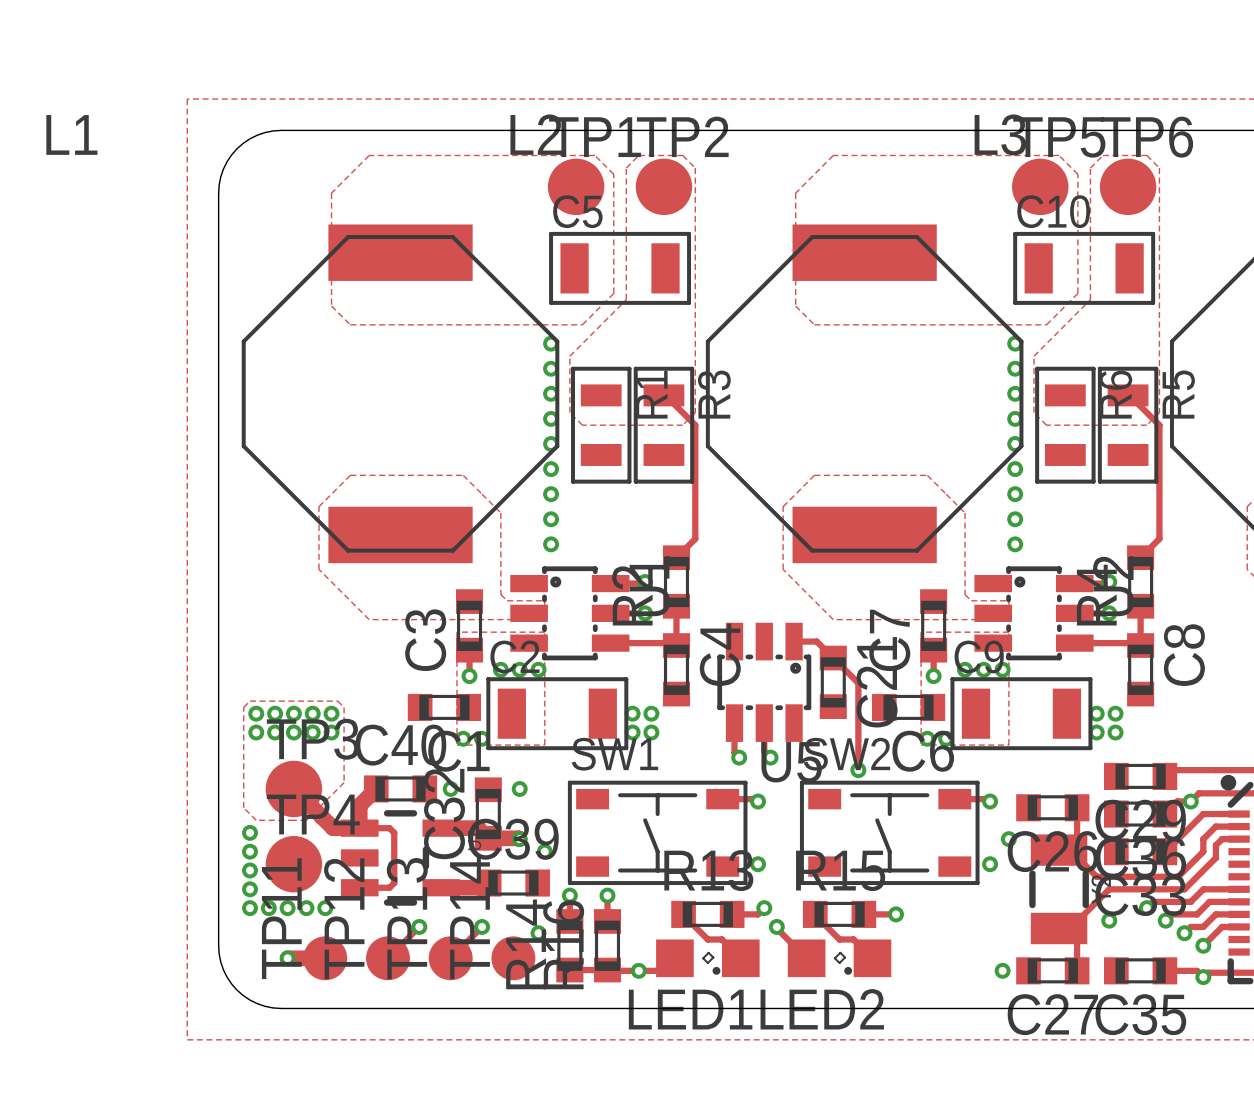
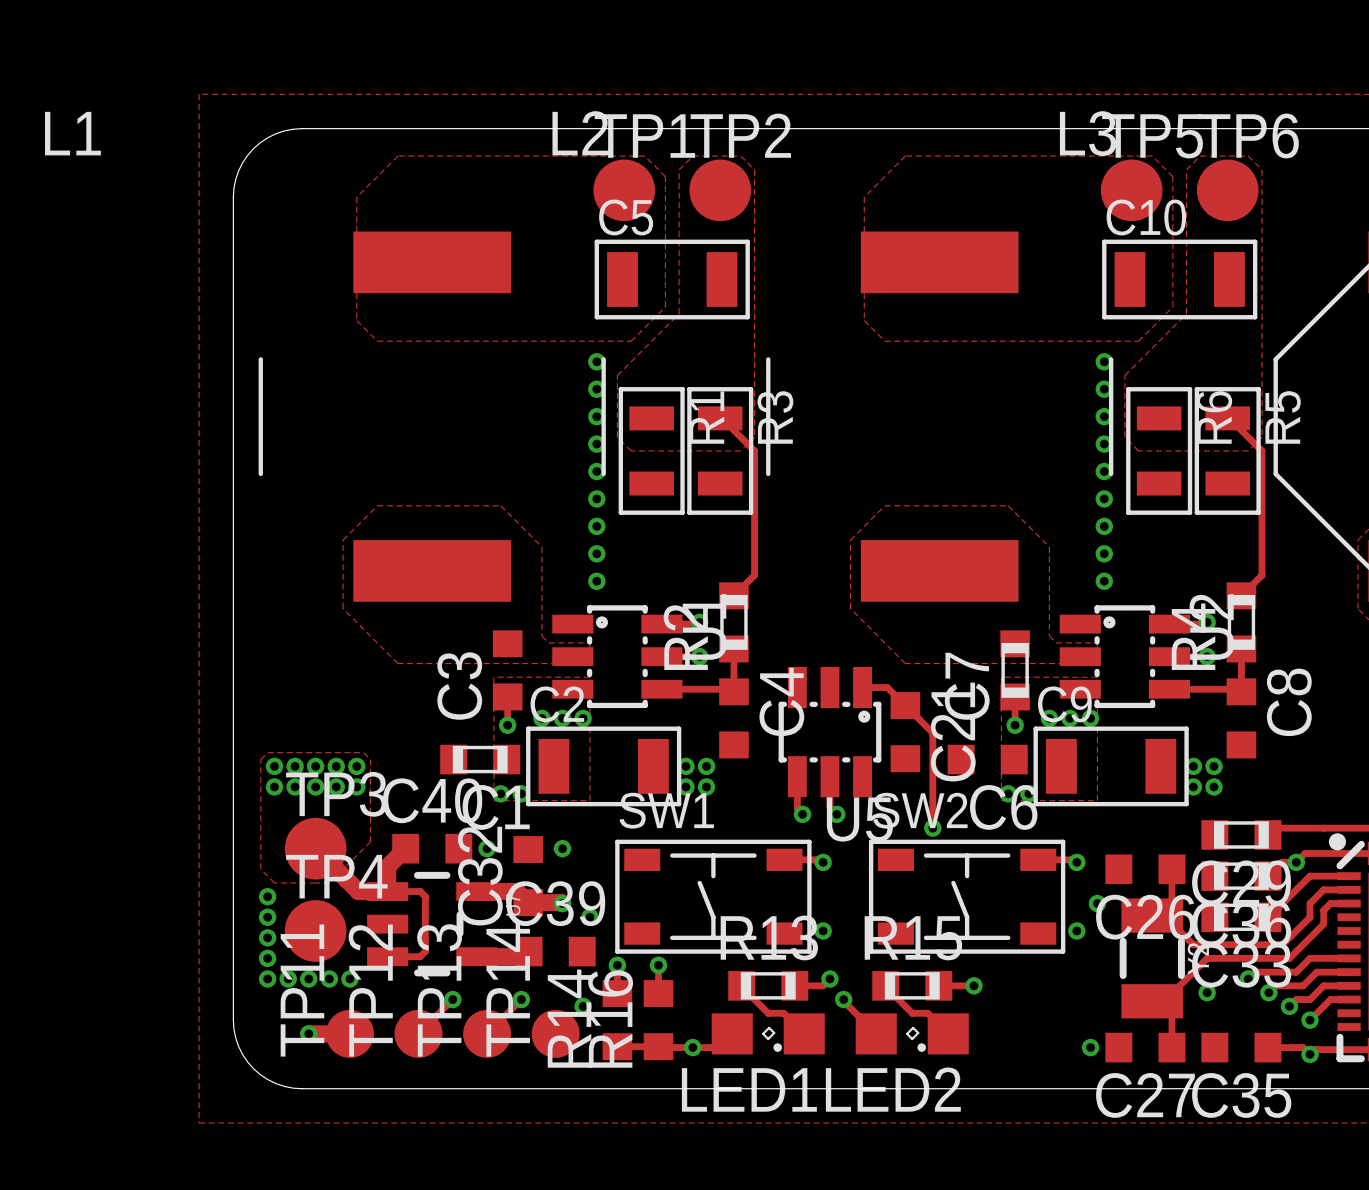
L1 footprint: [241, 224, 560, 564] -> [258, 231, 606, 602]
L2 footprint: [705, 224, 1024, 564] -> [766, 231, 1114, 602]
C3 footprint: [455, 589, 484, 663] -> [492, 630, 523, 711]
C4 footprint: [662, 633, 691, 707] -> [719, 678, 749, 759]
C8 footprint: [1127, 633, 1155, 707] -> [1226, 678, 1257, 759]
C21 footprint: [819, 645, 847, 719] -> [890, 692, 921, 773]
C6 footprint: [871, 693, 946, 721] -> [947, 744, 1028, 775]
C40 footprint: [363, 775, 438, 803] -> [392, 833, 473, 864]
C32 footprint: [474, 777, 502, 851] -> [513, 836, 544, 917]
C26 footprint: [1016, 794, 1090, 822] -> [1105, 854, 1186, 885]
C39 footprint: [476, 869, 551, 897] -> [515, 936, 596, 967]
R14 footprint: [556, 909, 584, 983] -> [602, 980, 633, 1061]
R16 footprint: [593, 909, 622, 983] -> [643, 980, 674, 1061]
C27 footprint: [1016, 957, 1090, 985] -> [1105, 1032, 1186, 1063]
C35 footprint: [1103, 957, 1178, 985] -> [1201, 1032, 1282, 1063]

